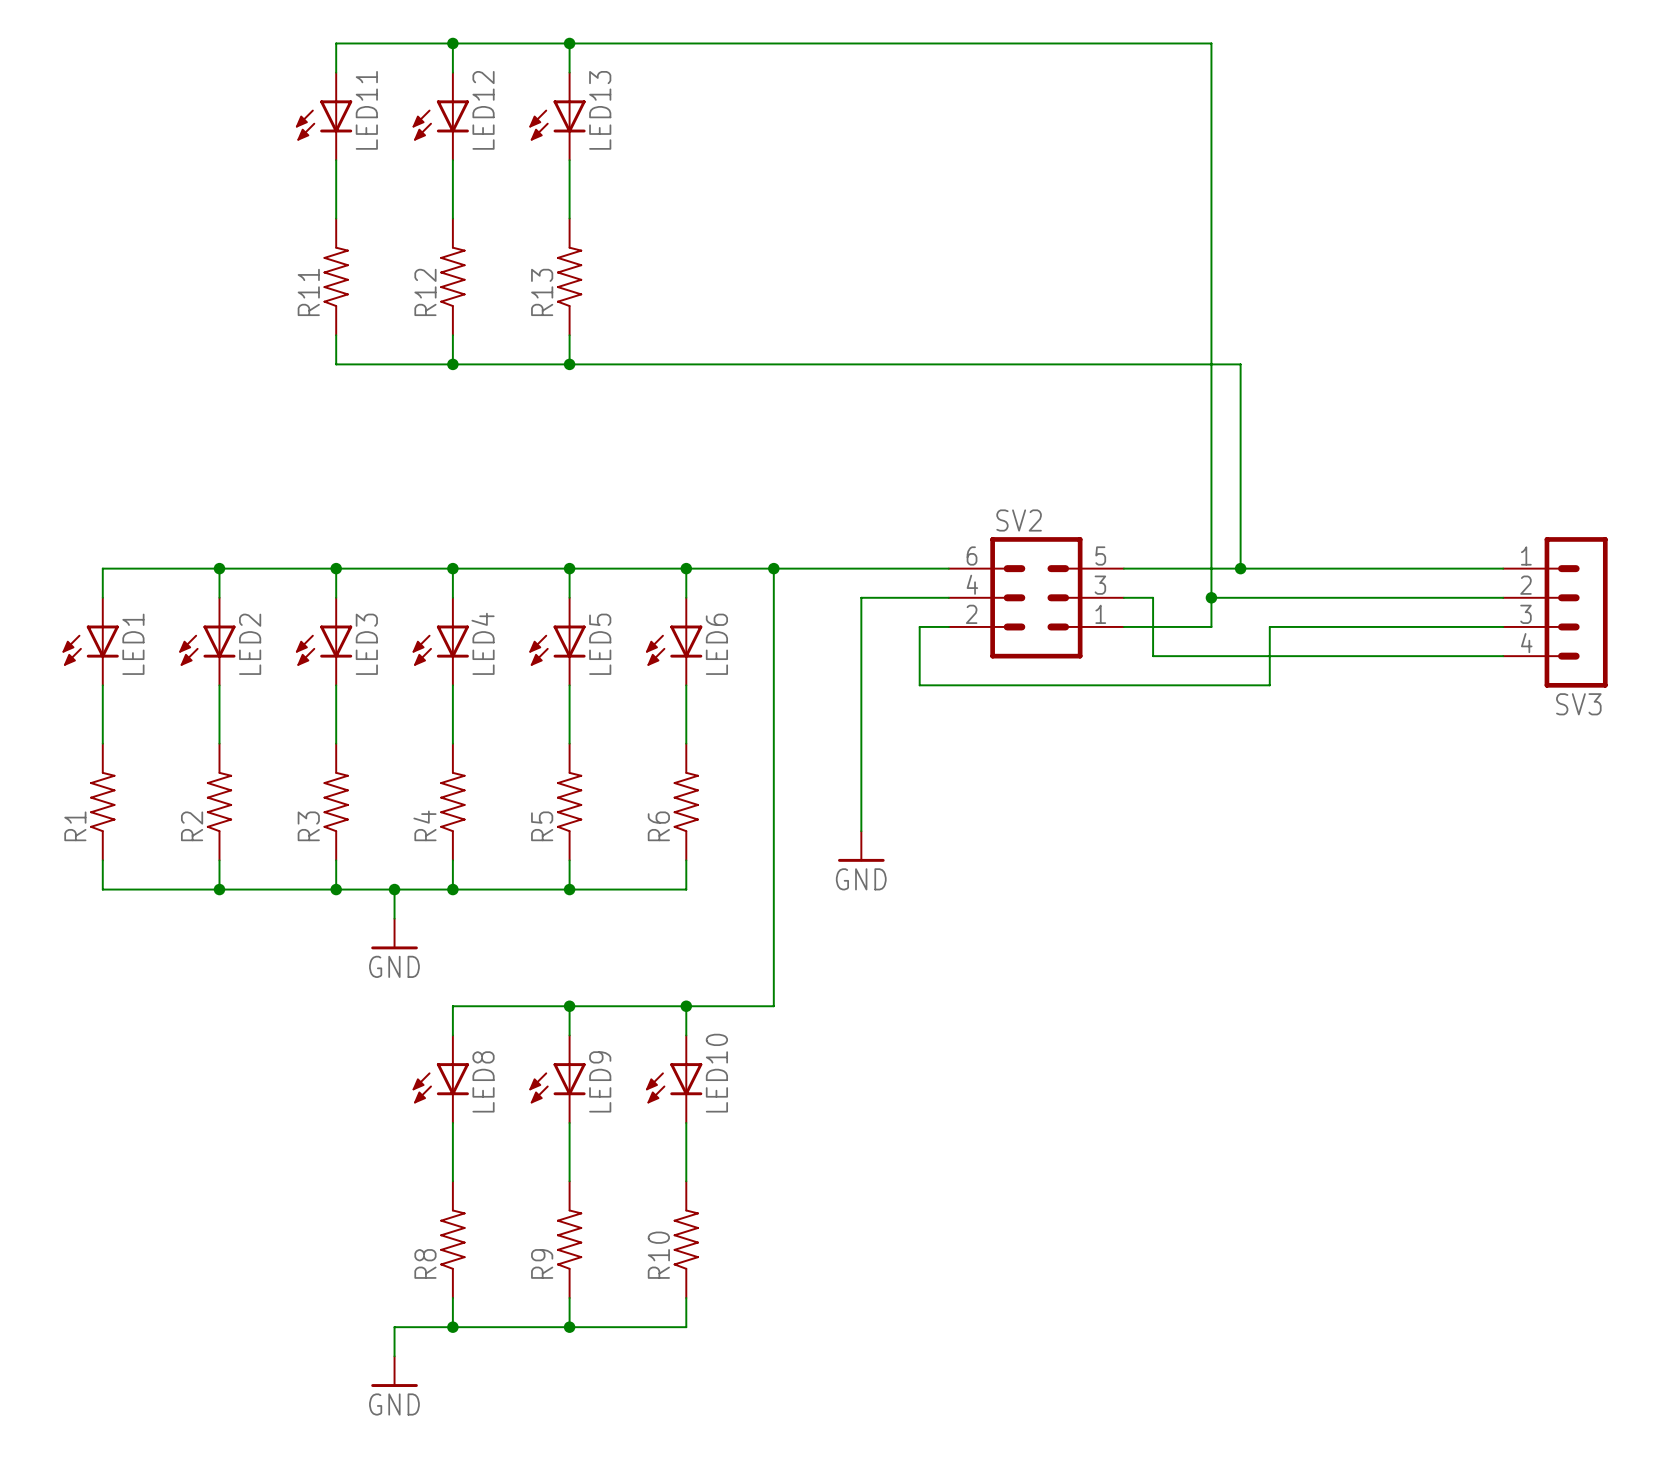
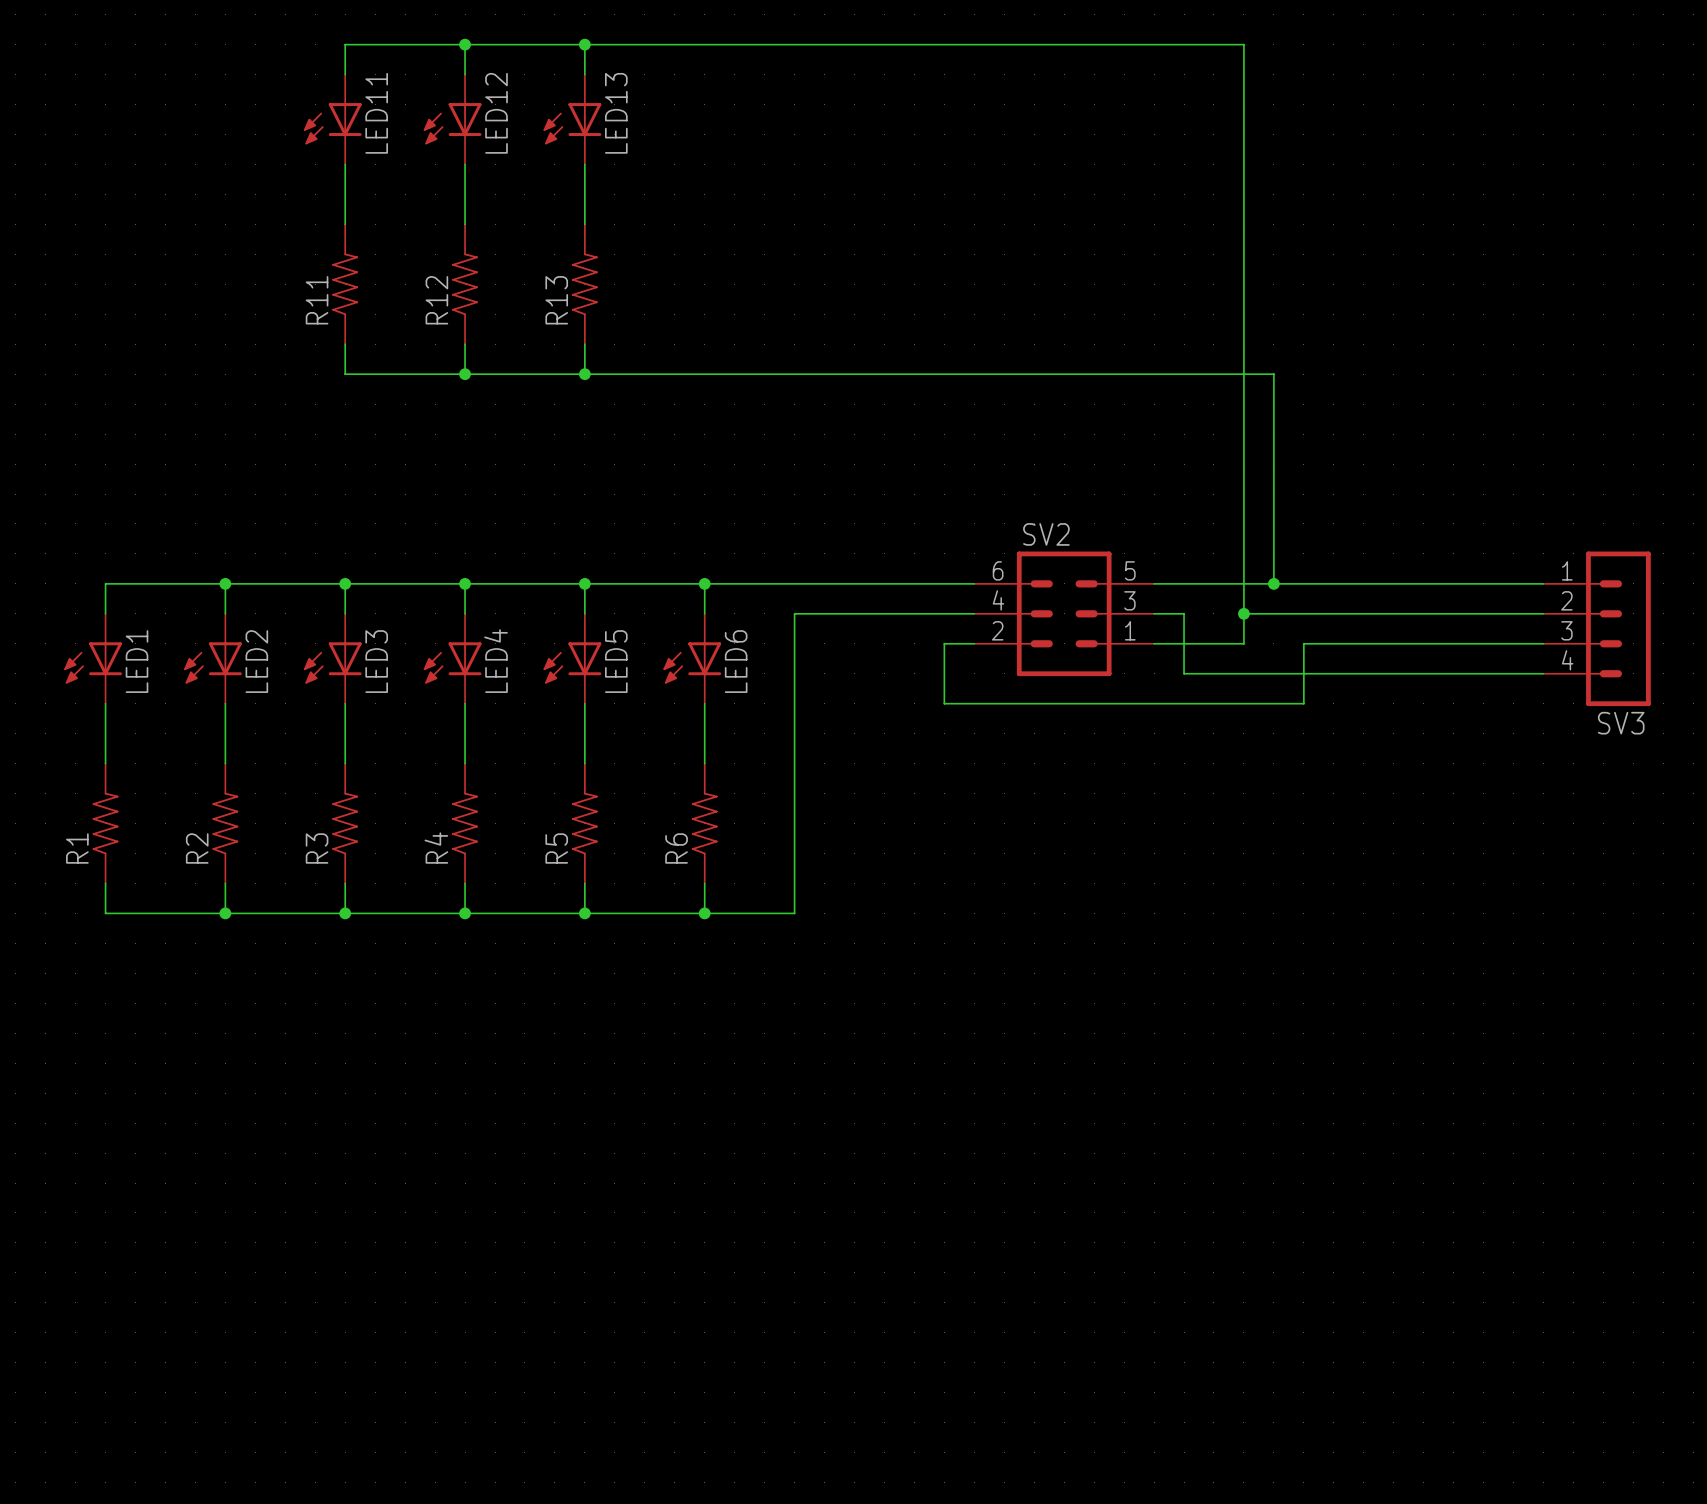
wire: (773, 568) (773, 597) -> (884, 613) (794, 613)
junction: (773, 568) -> none
wire: (861, 597) (861, 831) -> none
power symbol: GND (861, 846) -> none
wire: (394, 889) (394, 918) -> none
junction: (394, 889) -> none
junction: none -> (704, 913)
wire: (773, 889) (773, 1006) (452, 1006) (452, 1035) -> (794, 913) (704, 913)
power symbol: GND (394, 934) -> none
wire: (569, 1006) (569, 1035) -> none
junction: (569, 1006) -> none
wire: (686, 1006) (686, 1035) -> none
junction: (686, 1006) -> none
LED8: (440, 1079) -> none
LED9: (557, 1079) -> none
LED10: (674, 1079) -> none
wire: (452, 1122) (452, 1181) -> none
wire: (569, 1122) (569, 1181) -> none
wire: (686, 1122) (686, 1181) -> none
R8: (452, 1239) -> none
R9: (569, 1239) -> none
R10: (686, 1239) -> none
wire: (452, 1298) (452, 1327) -> none
wire: (569, 1298) (569, 1327) -> none
wire: (686, 1298) (686, 1327) (394, 1327) (394, 1356) -> none
junction: (452, 1327) -> none
junction: (569, 1327) -> none
power symbol: GND (394, 1371) -> none

